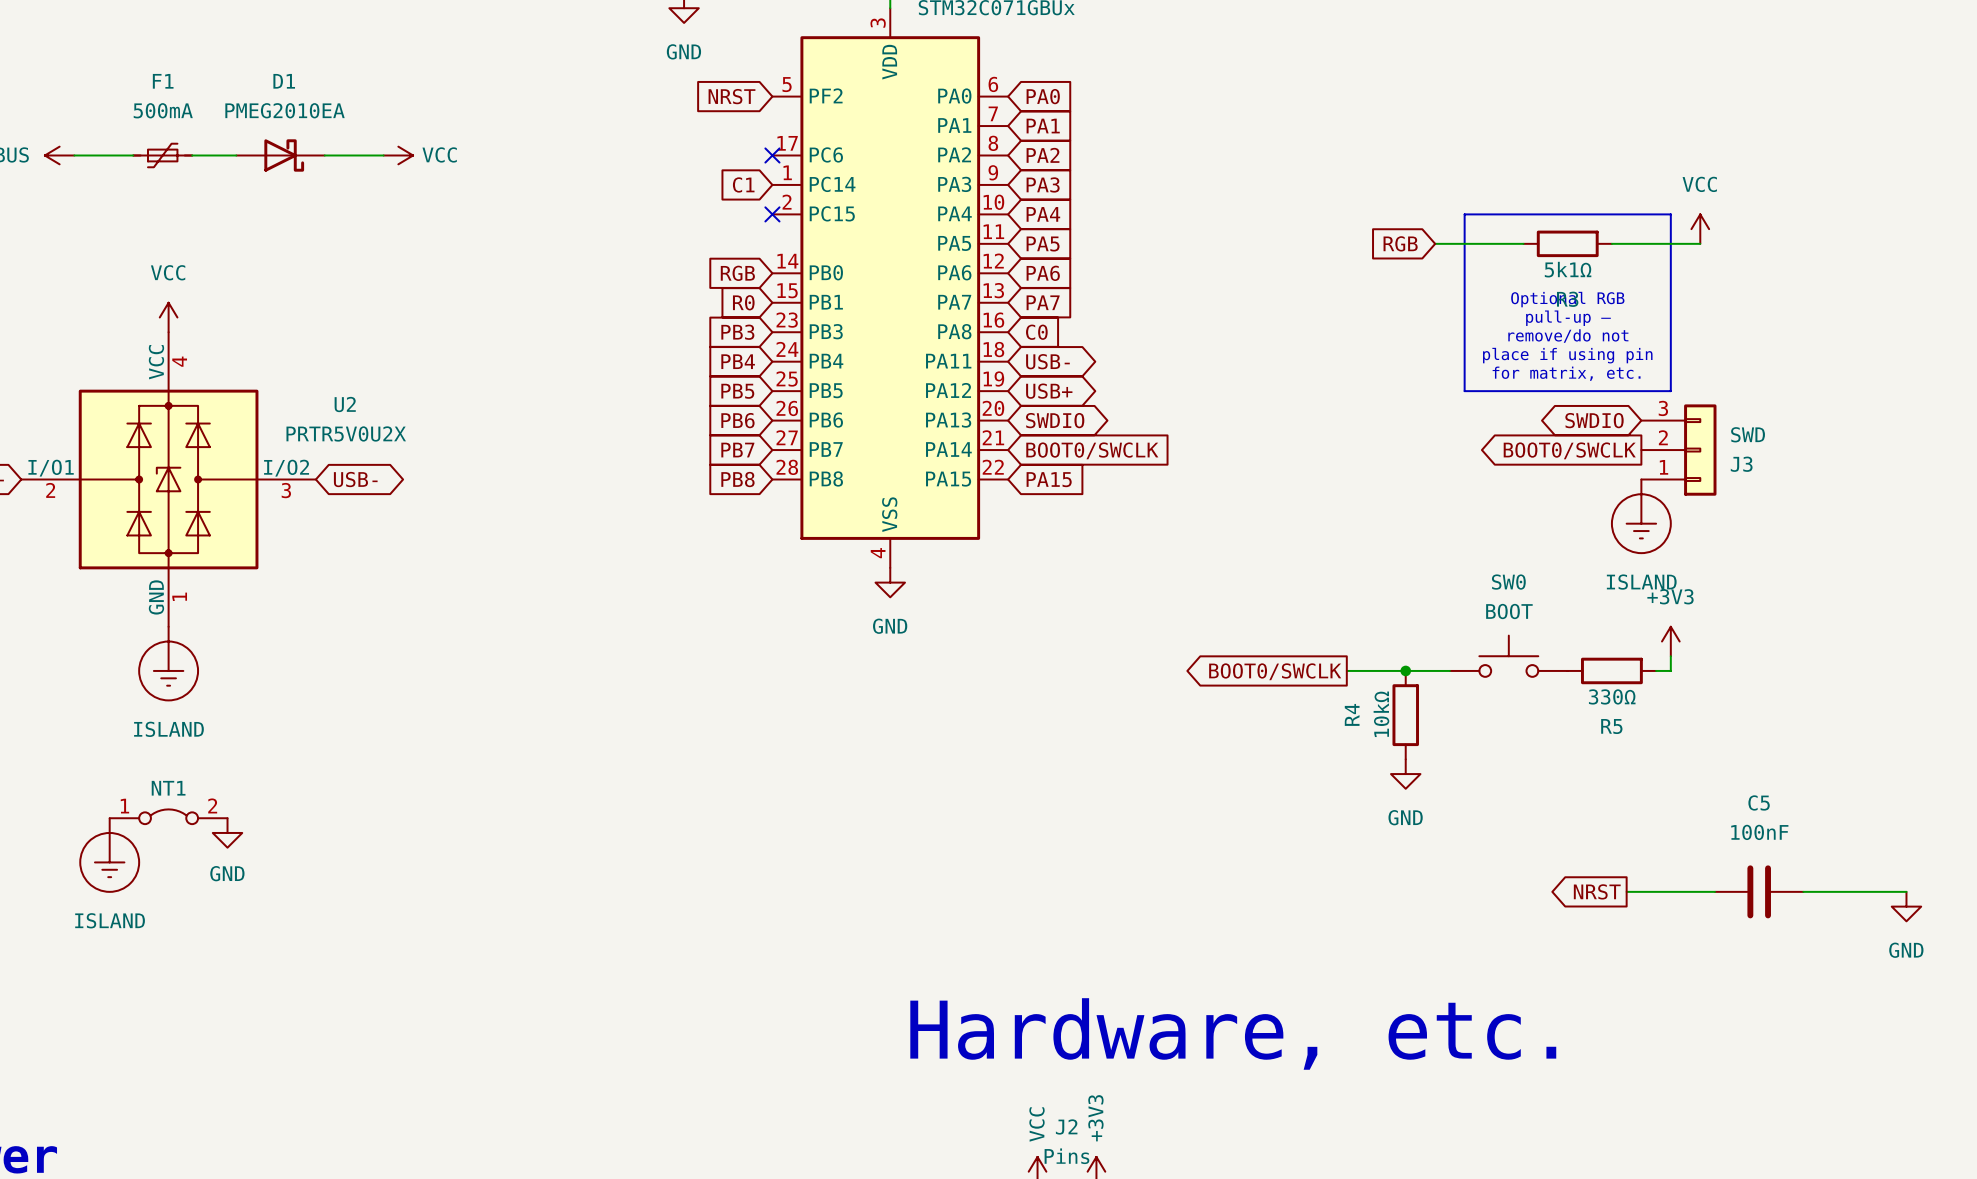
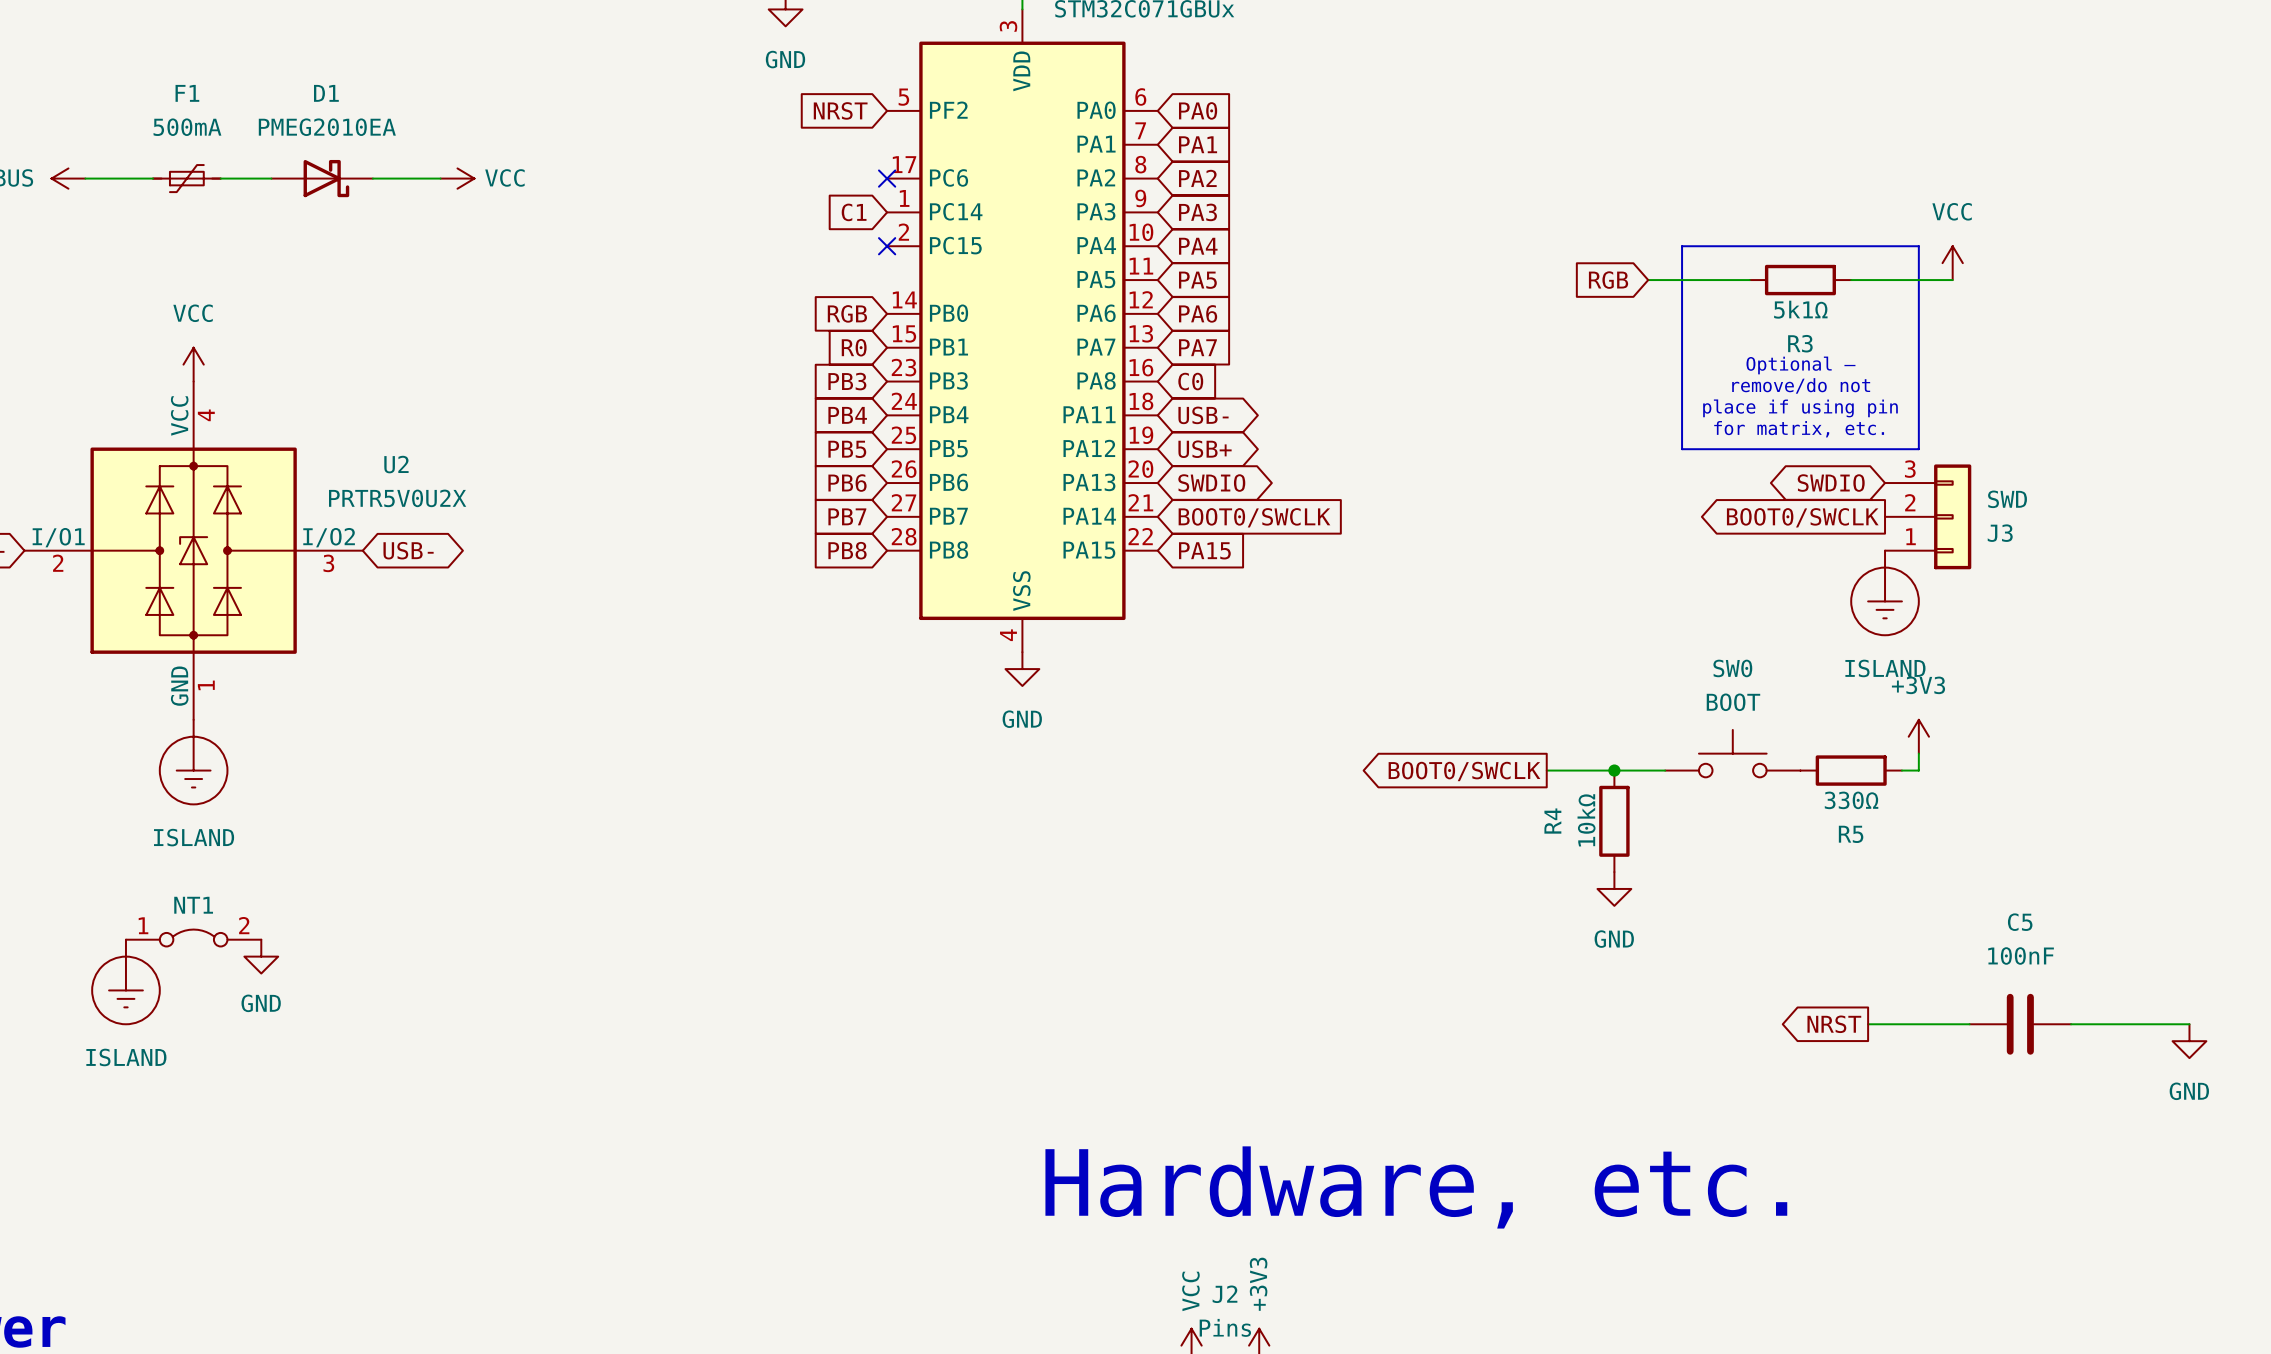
text: Optional RGB (1567, 299) -> none
text: pull-up — (1568, 318) -> Optional — (1800, 365)

